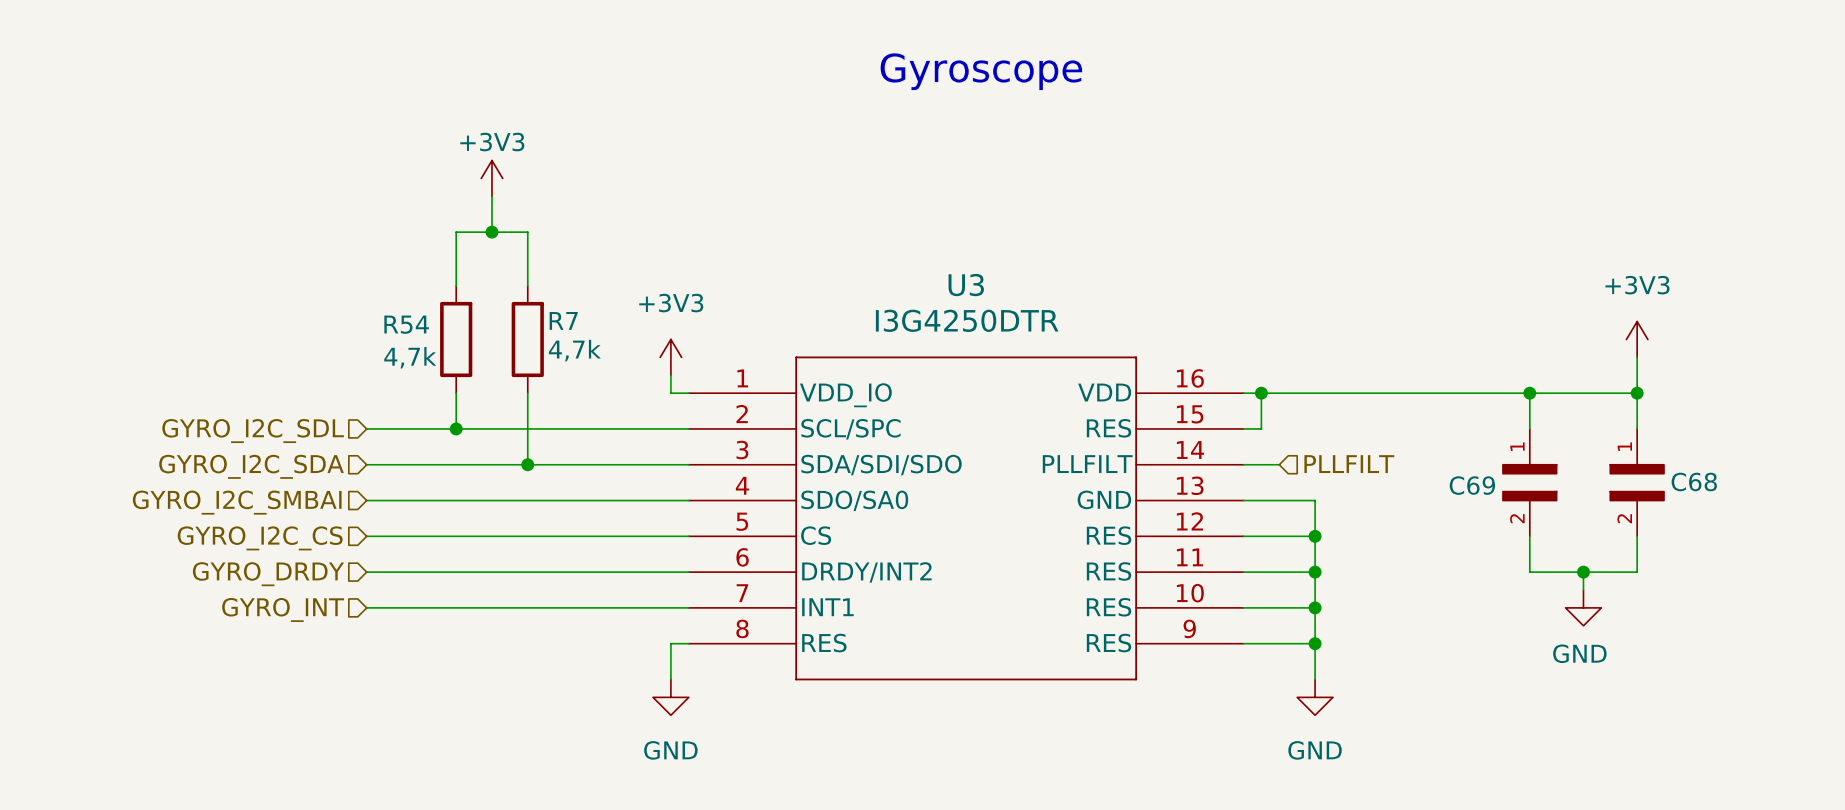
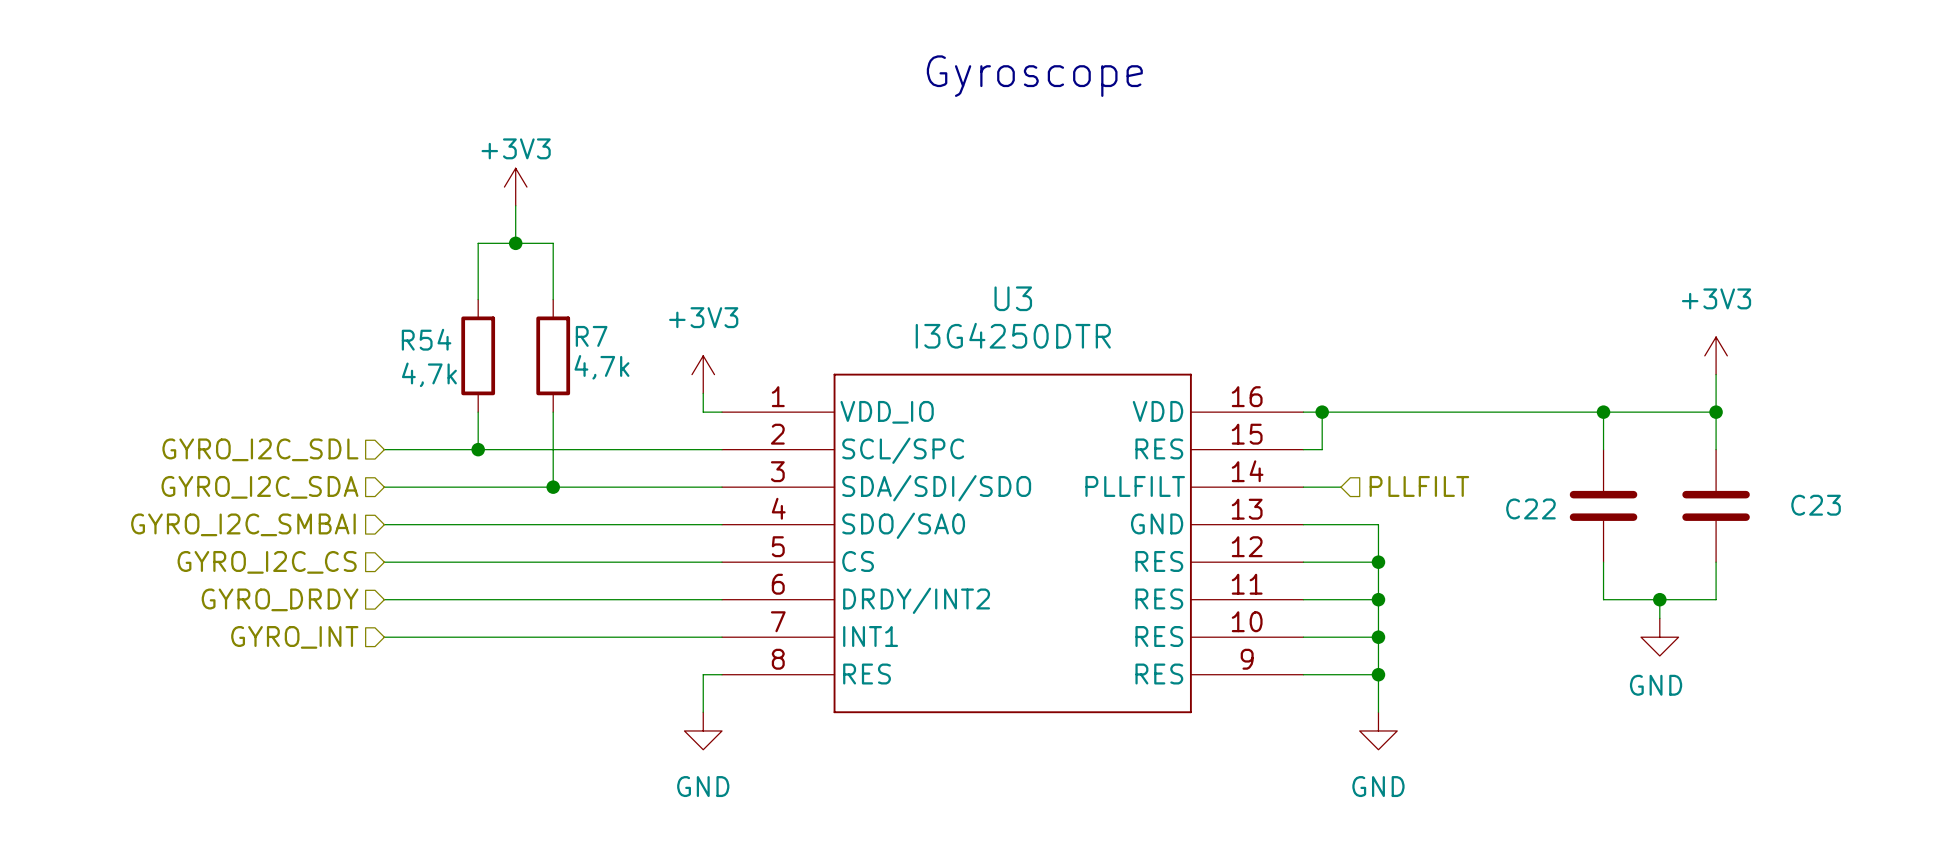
C69: (1529, 482) -> none
C22: none -> (1603, 505)
C68: (1637, 482) -> none
C23: none -> (1716, 505)

